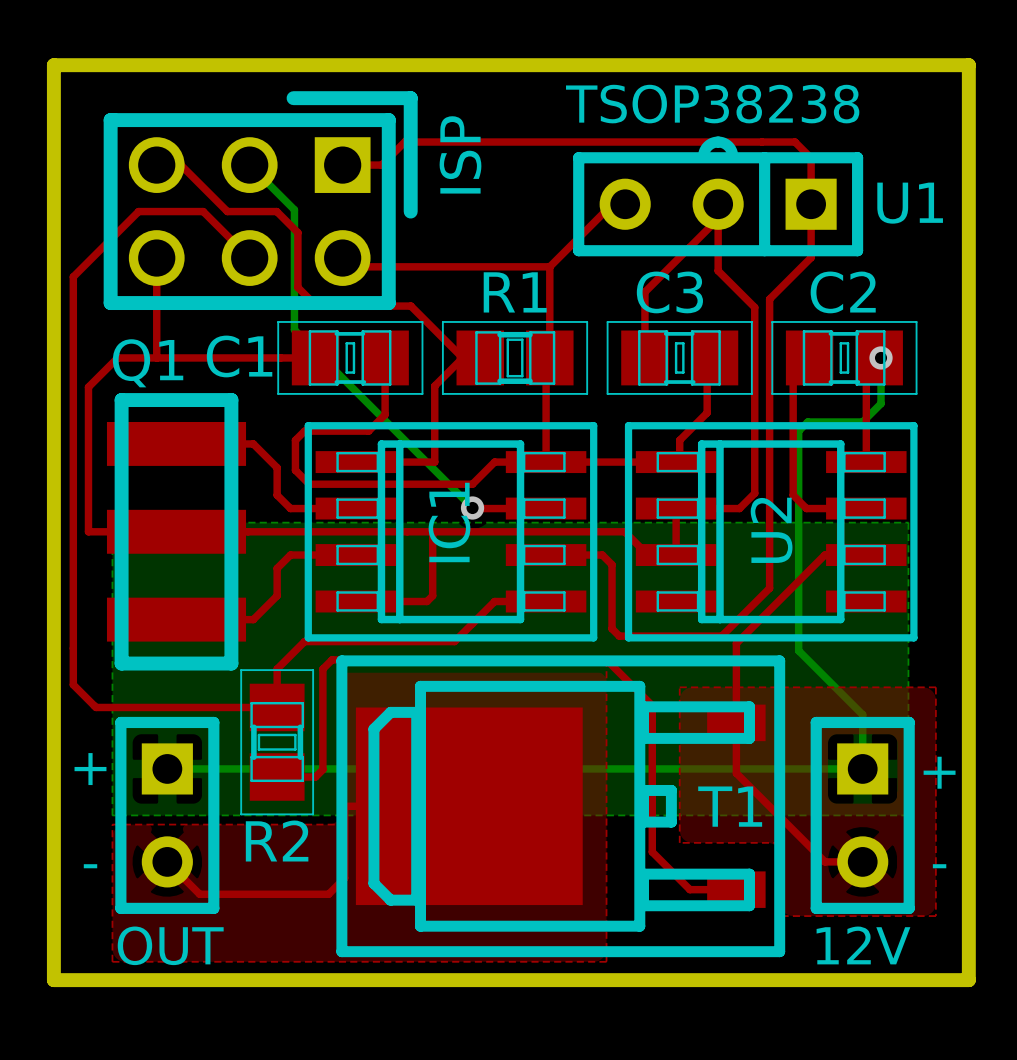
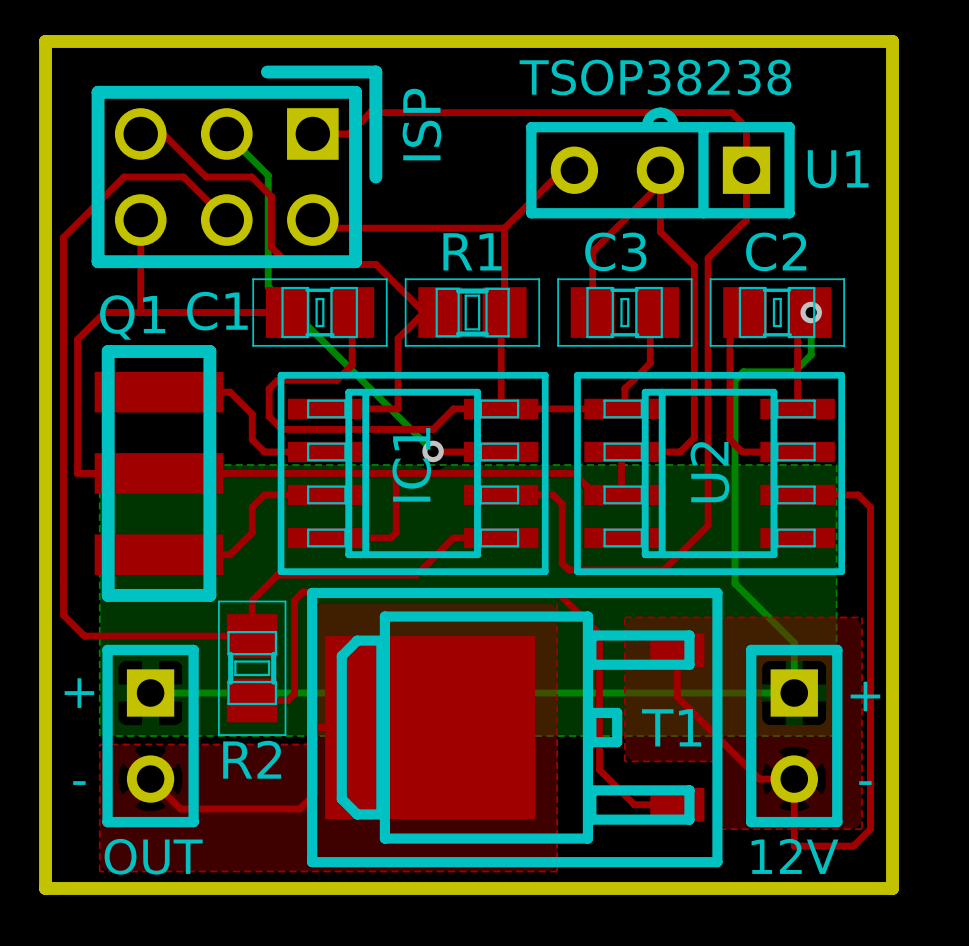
top track: (840, 555) (824, 555) (736, 643) (736, 722) -> none
top track: none -> (797, 494) (858, 494) (870, 507) (870, 829) (853, 846) (794, 846) (794, 779)

